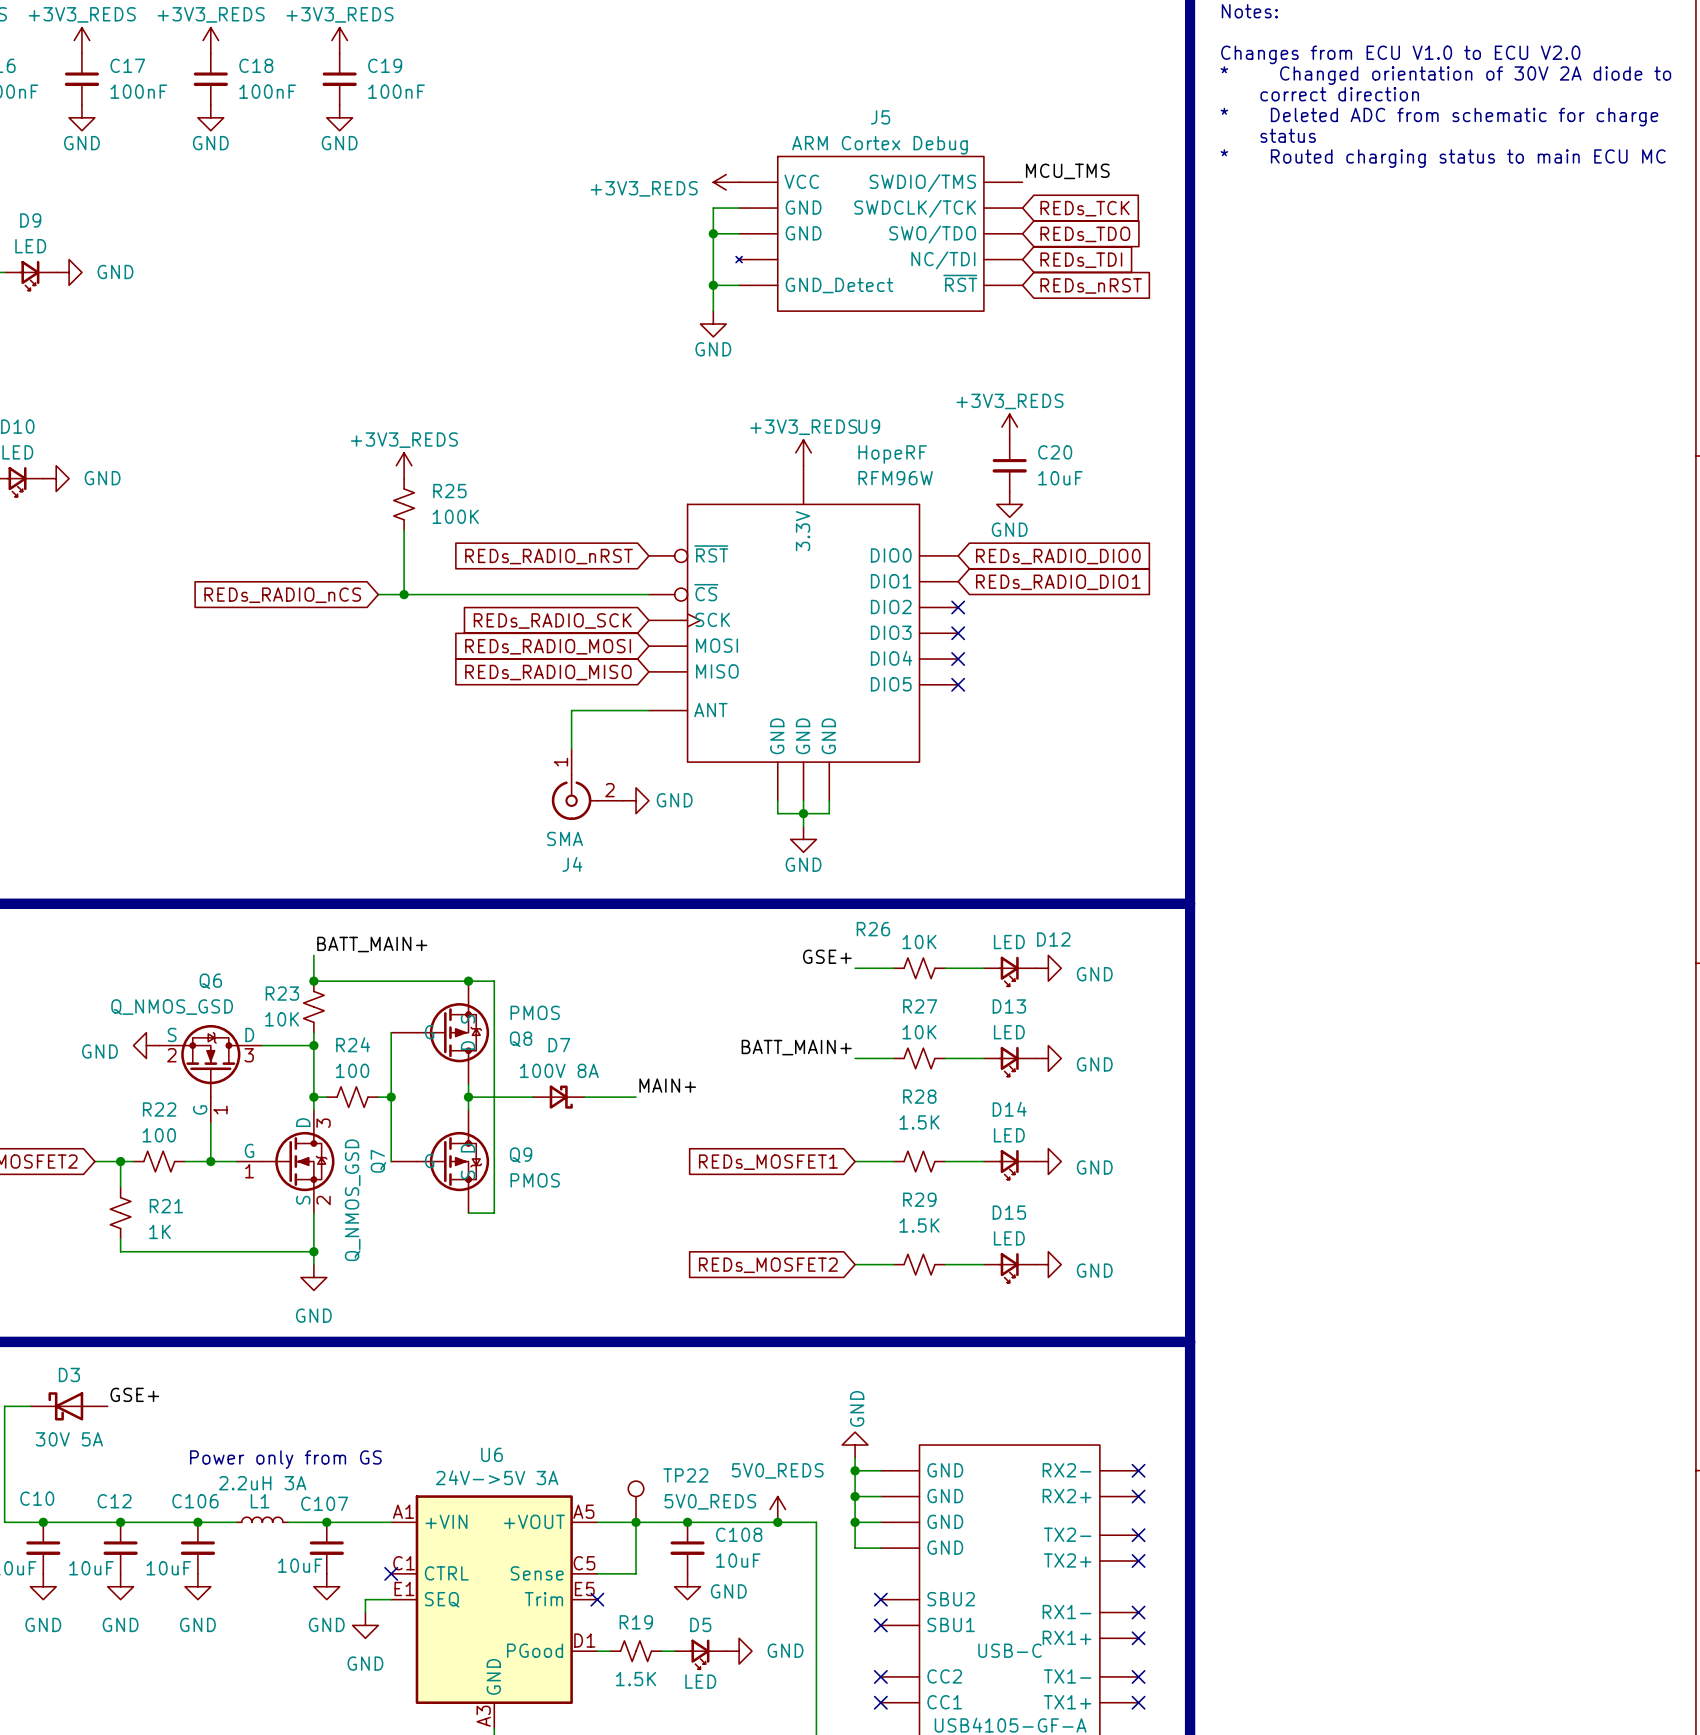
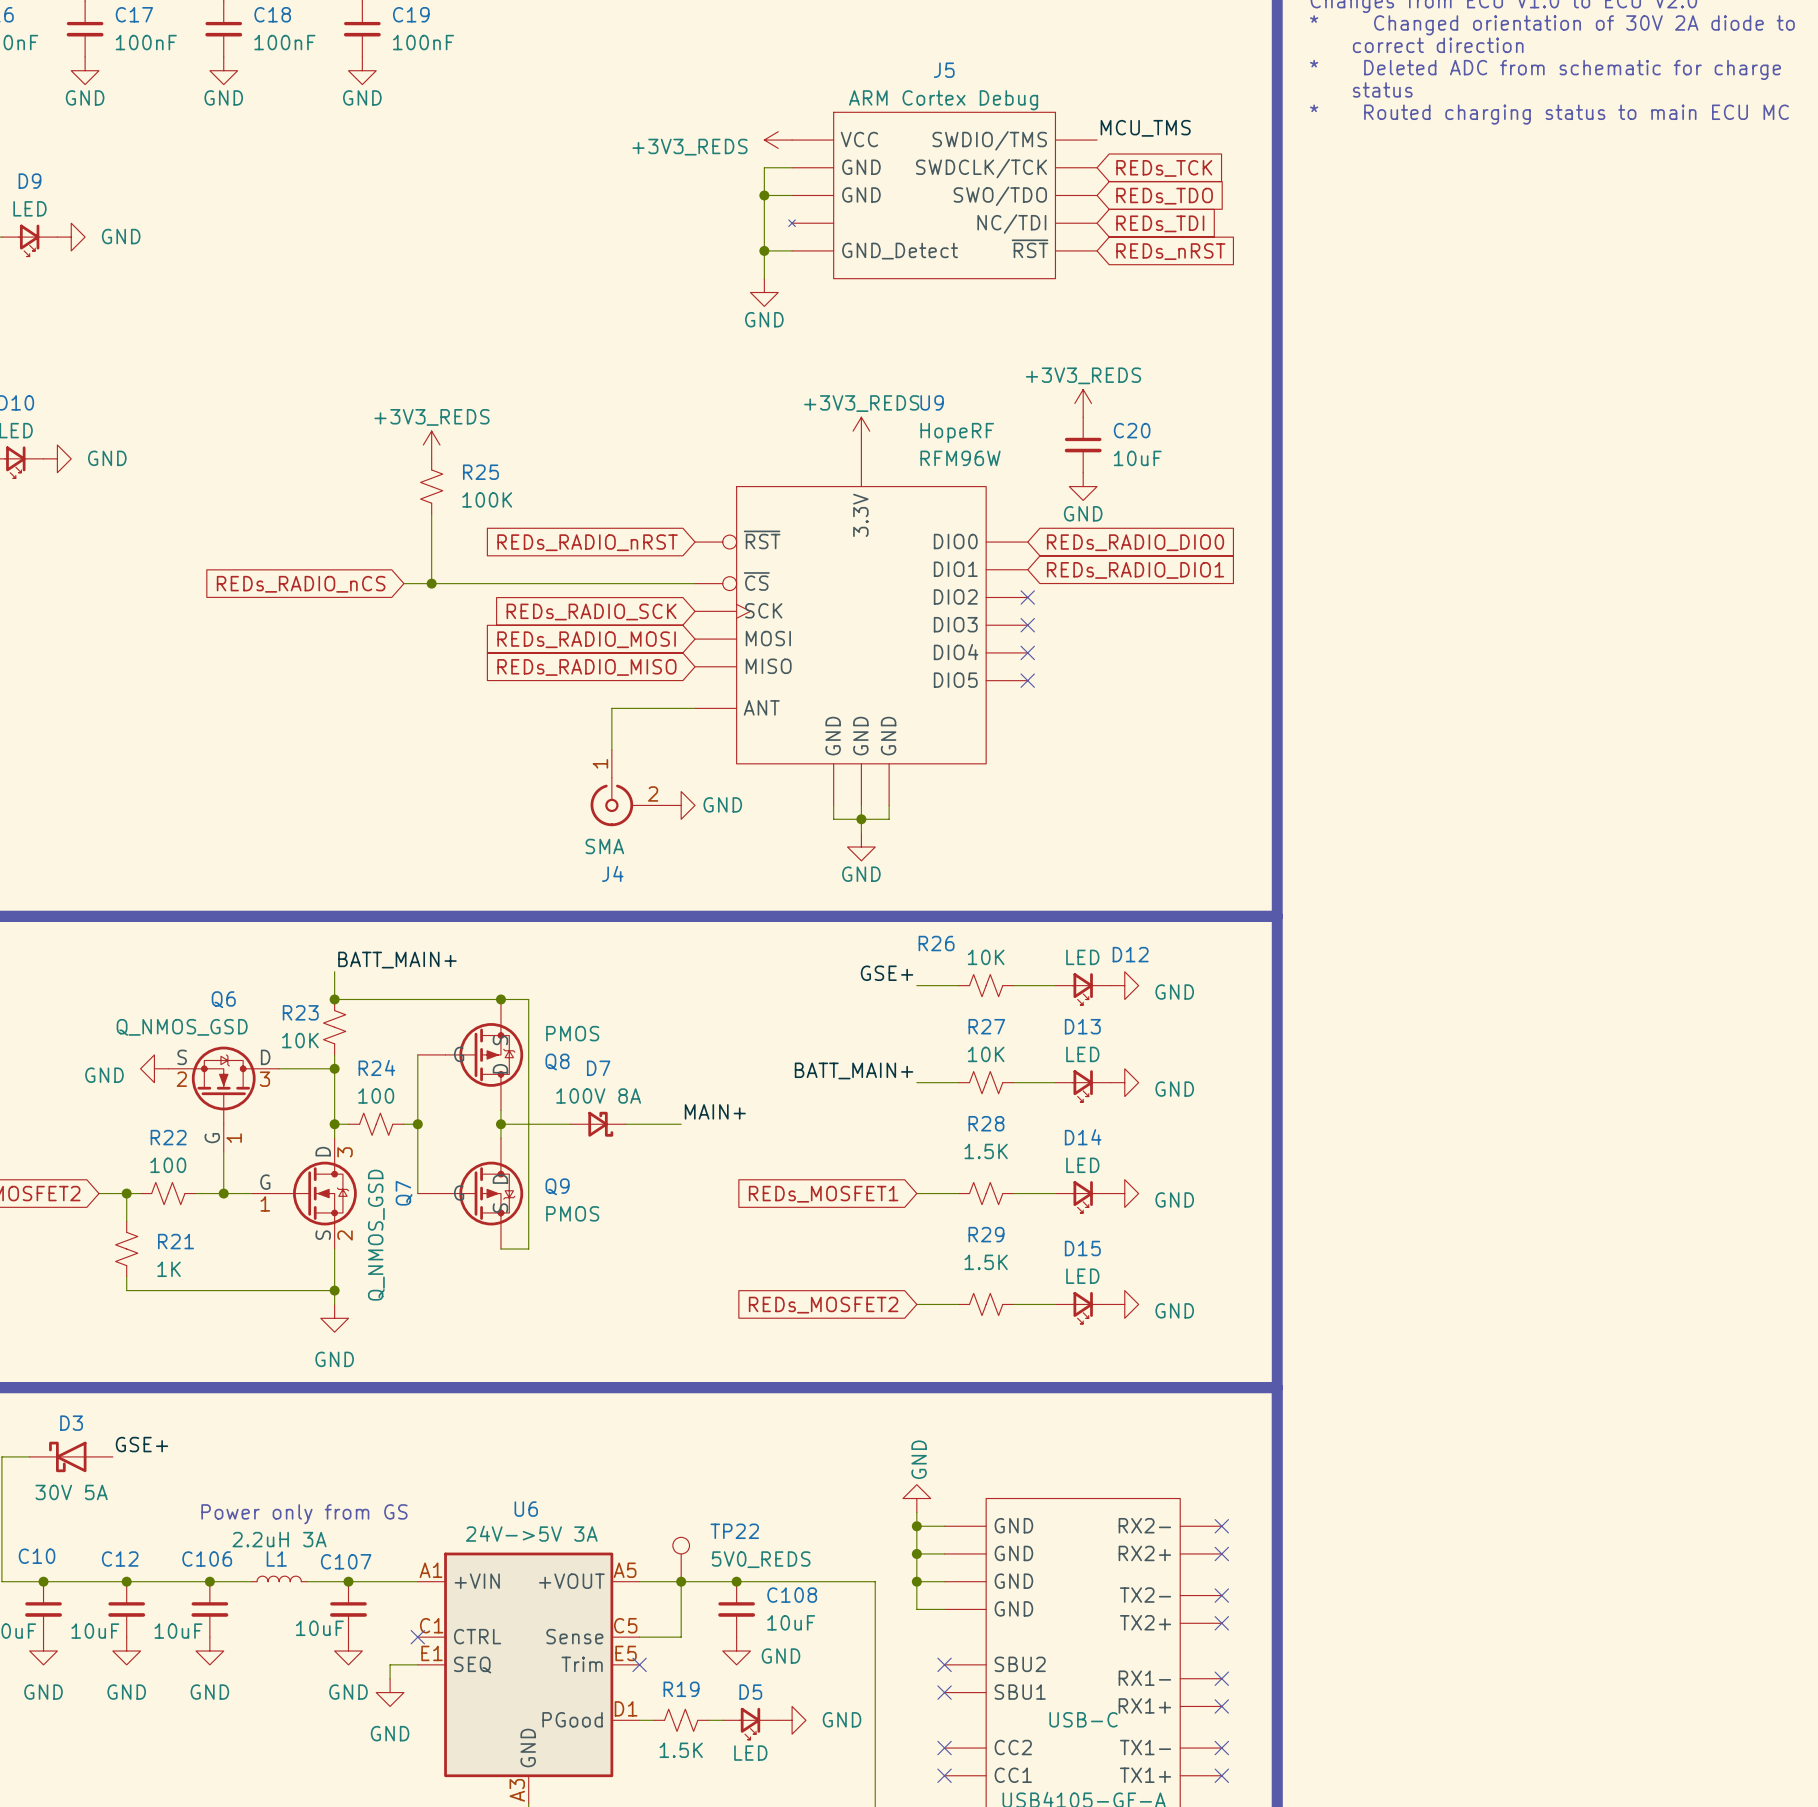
power symbol: 5V0_REDS (777, 1509) -> none
junction: (777, 1522) -> none

